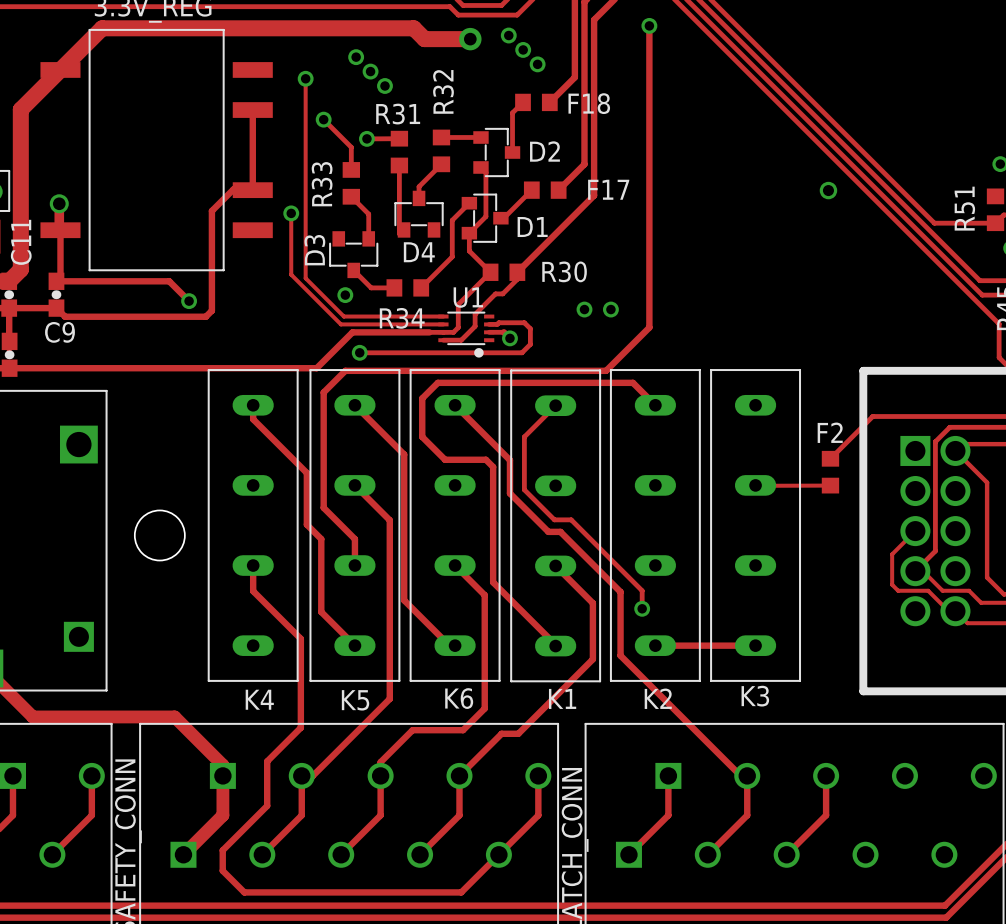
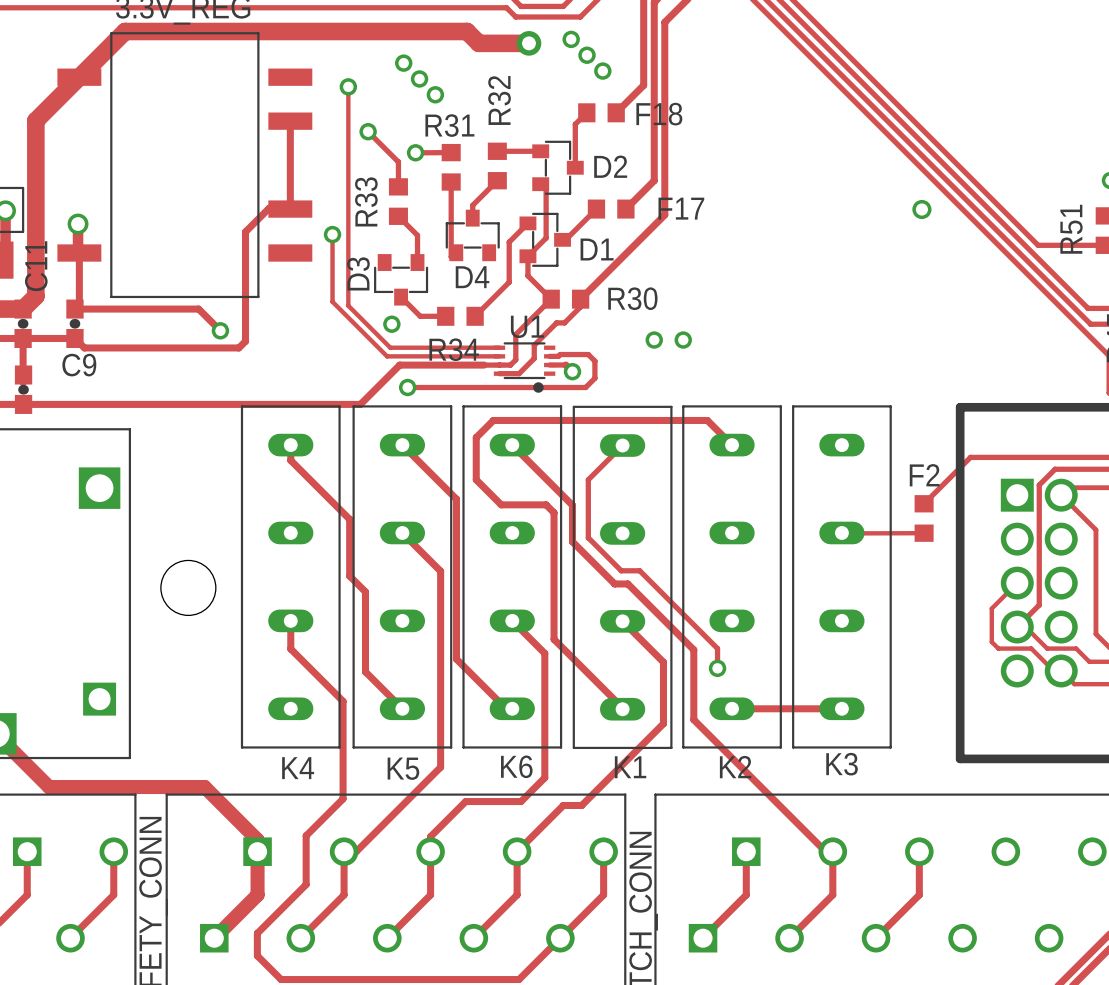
track: (649, 25) (649, 327) (606, 370) (345, 370) (323, 392) (323, 507) (354, 539) (354, 565) -> none
via: (649, 25) -> none

